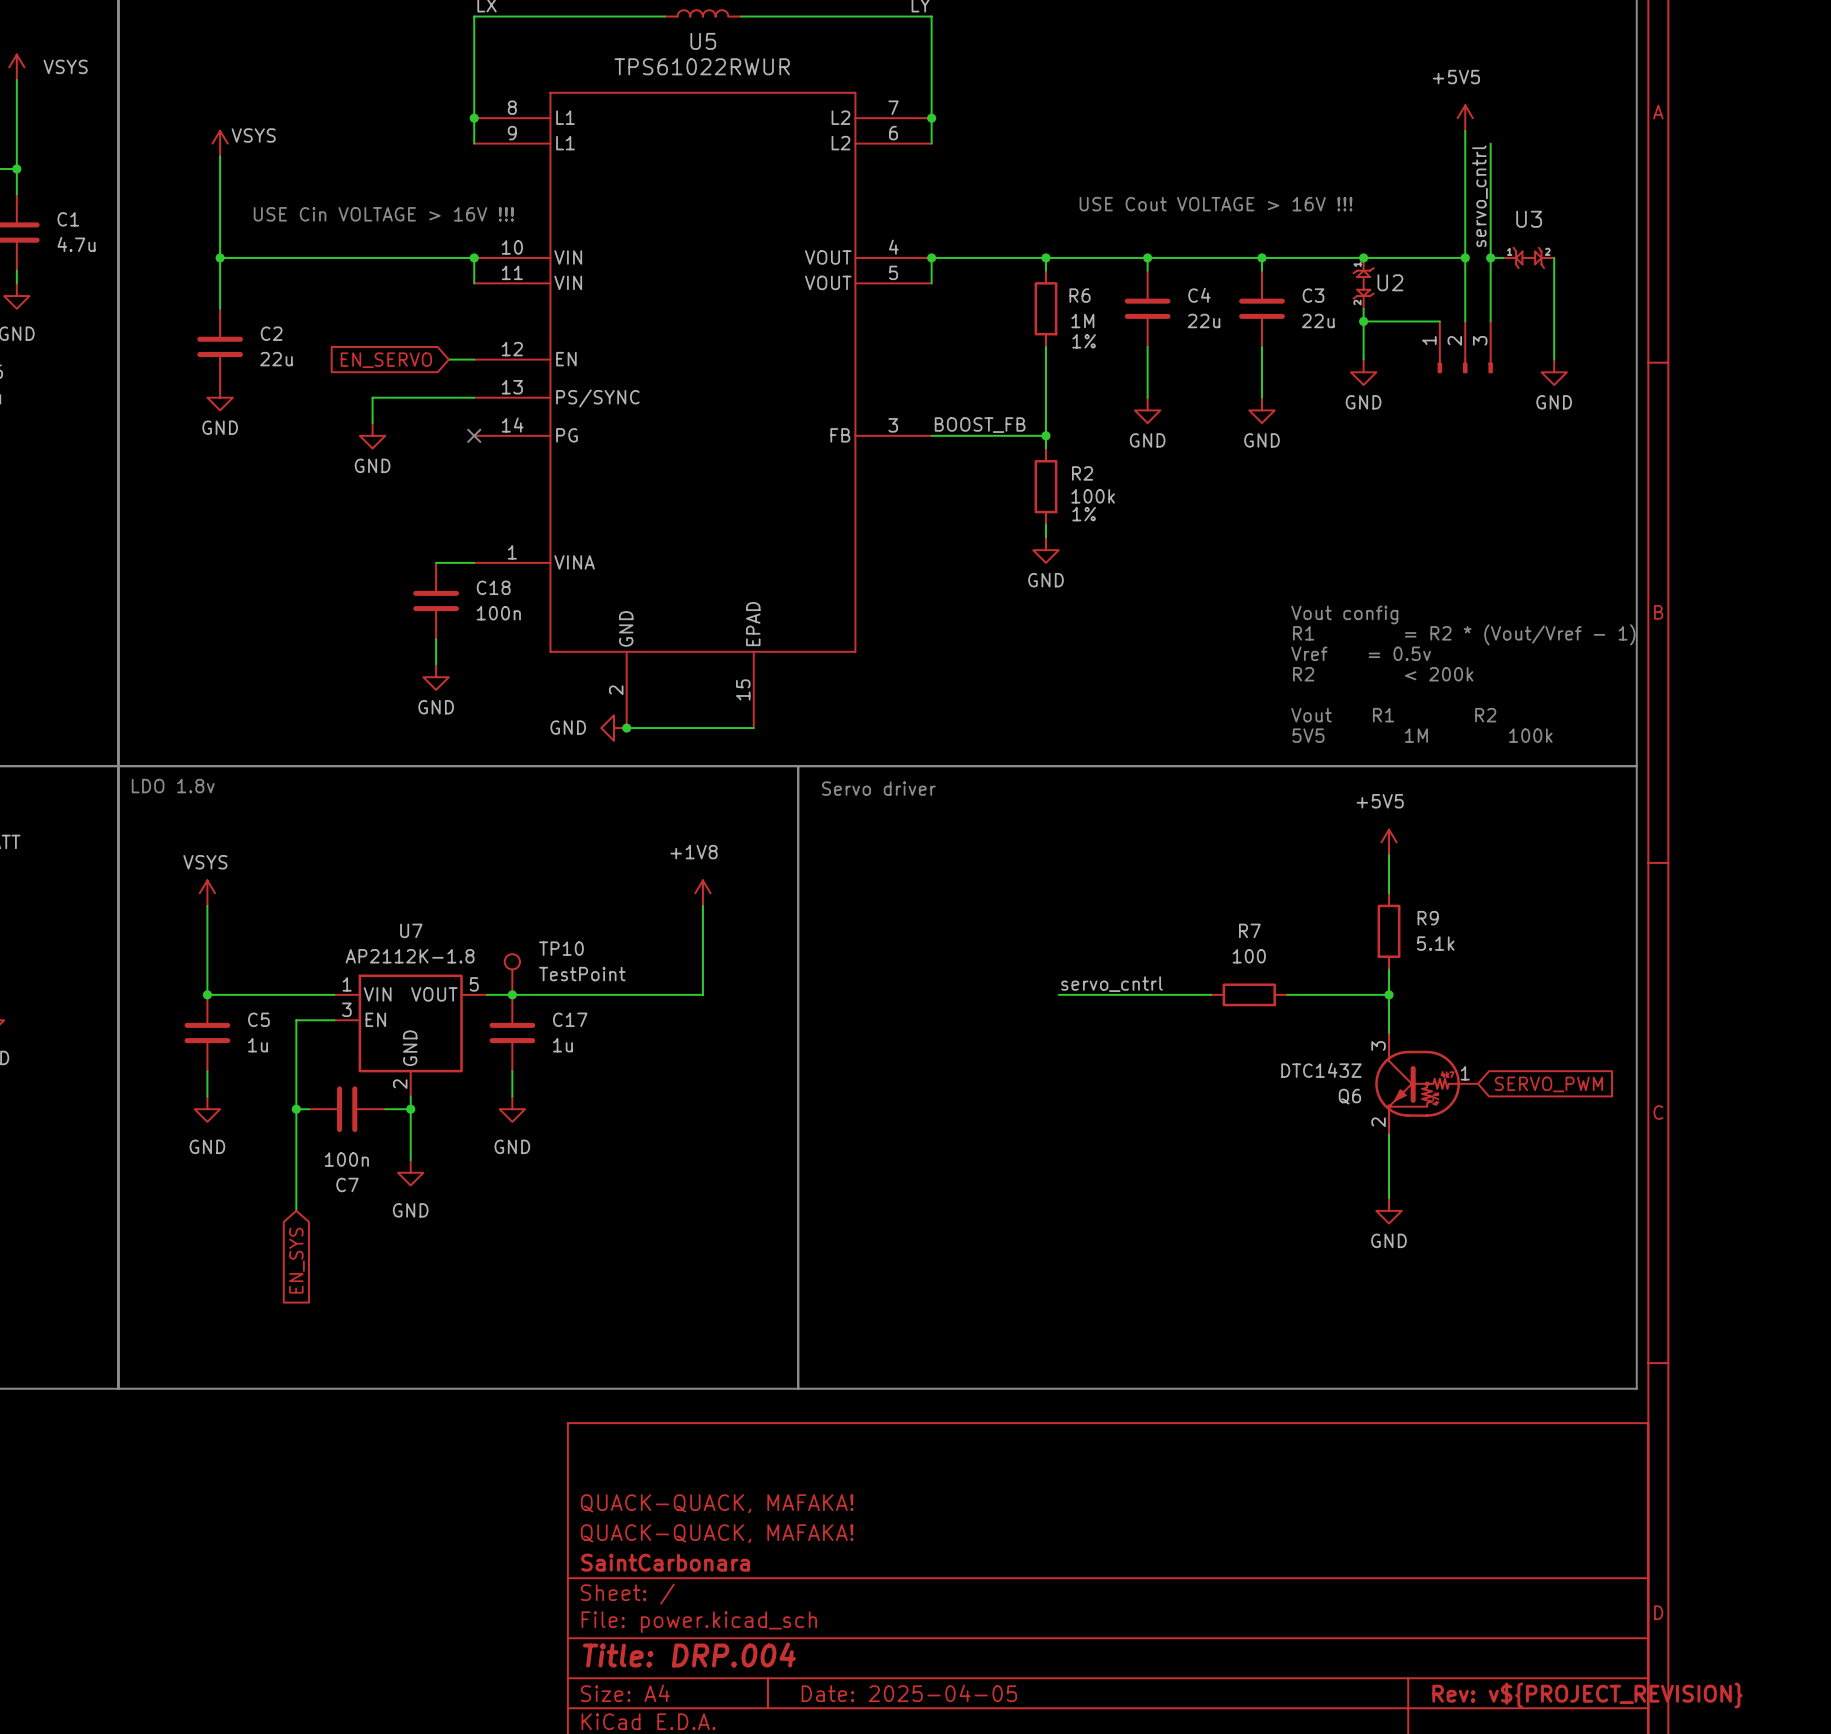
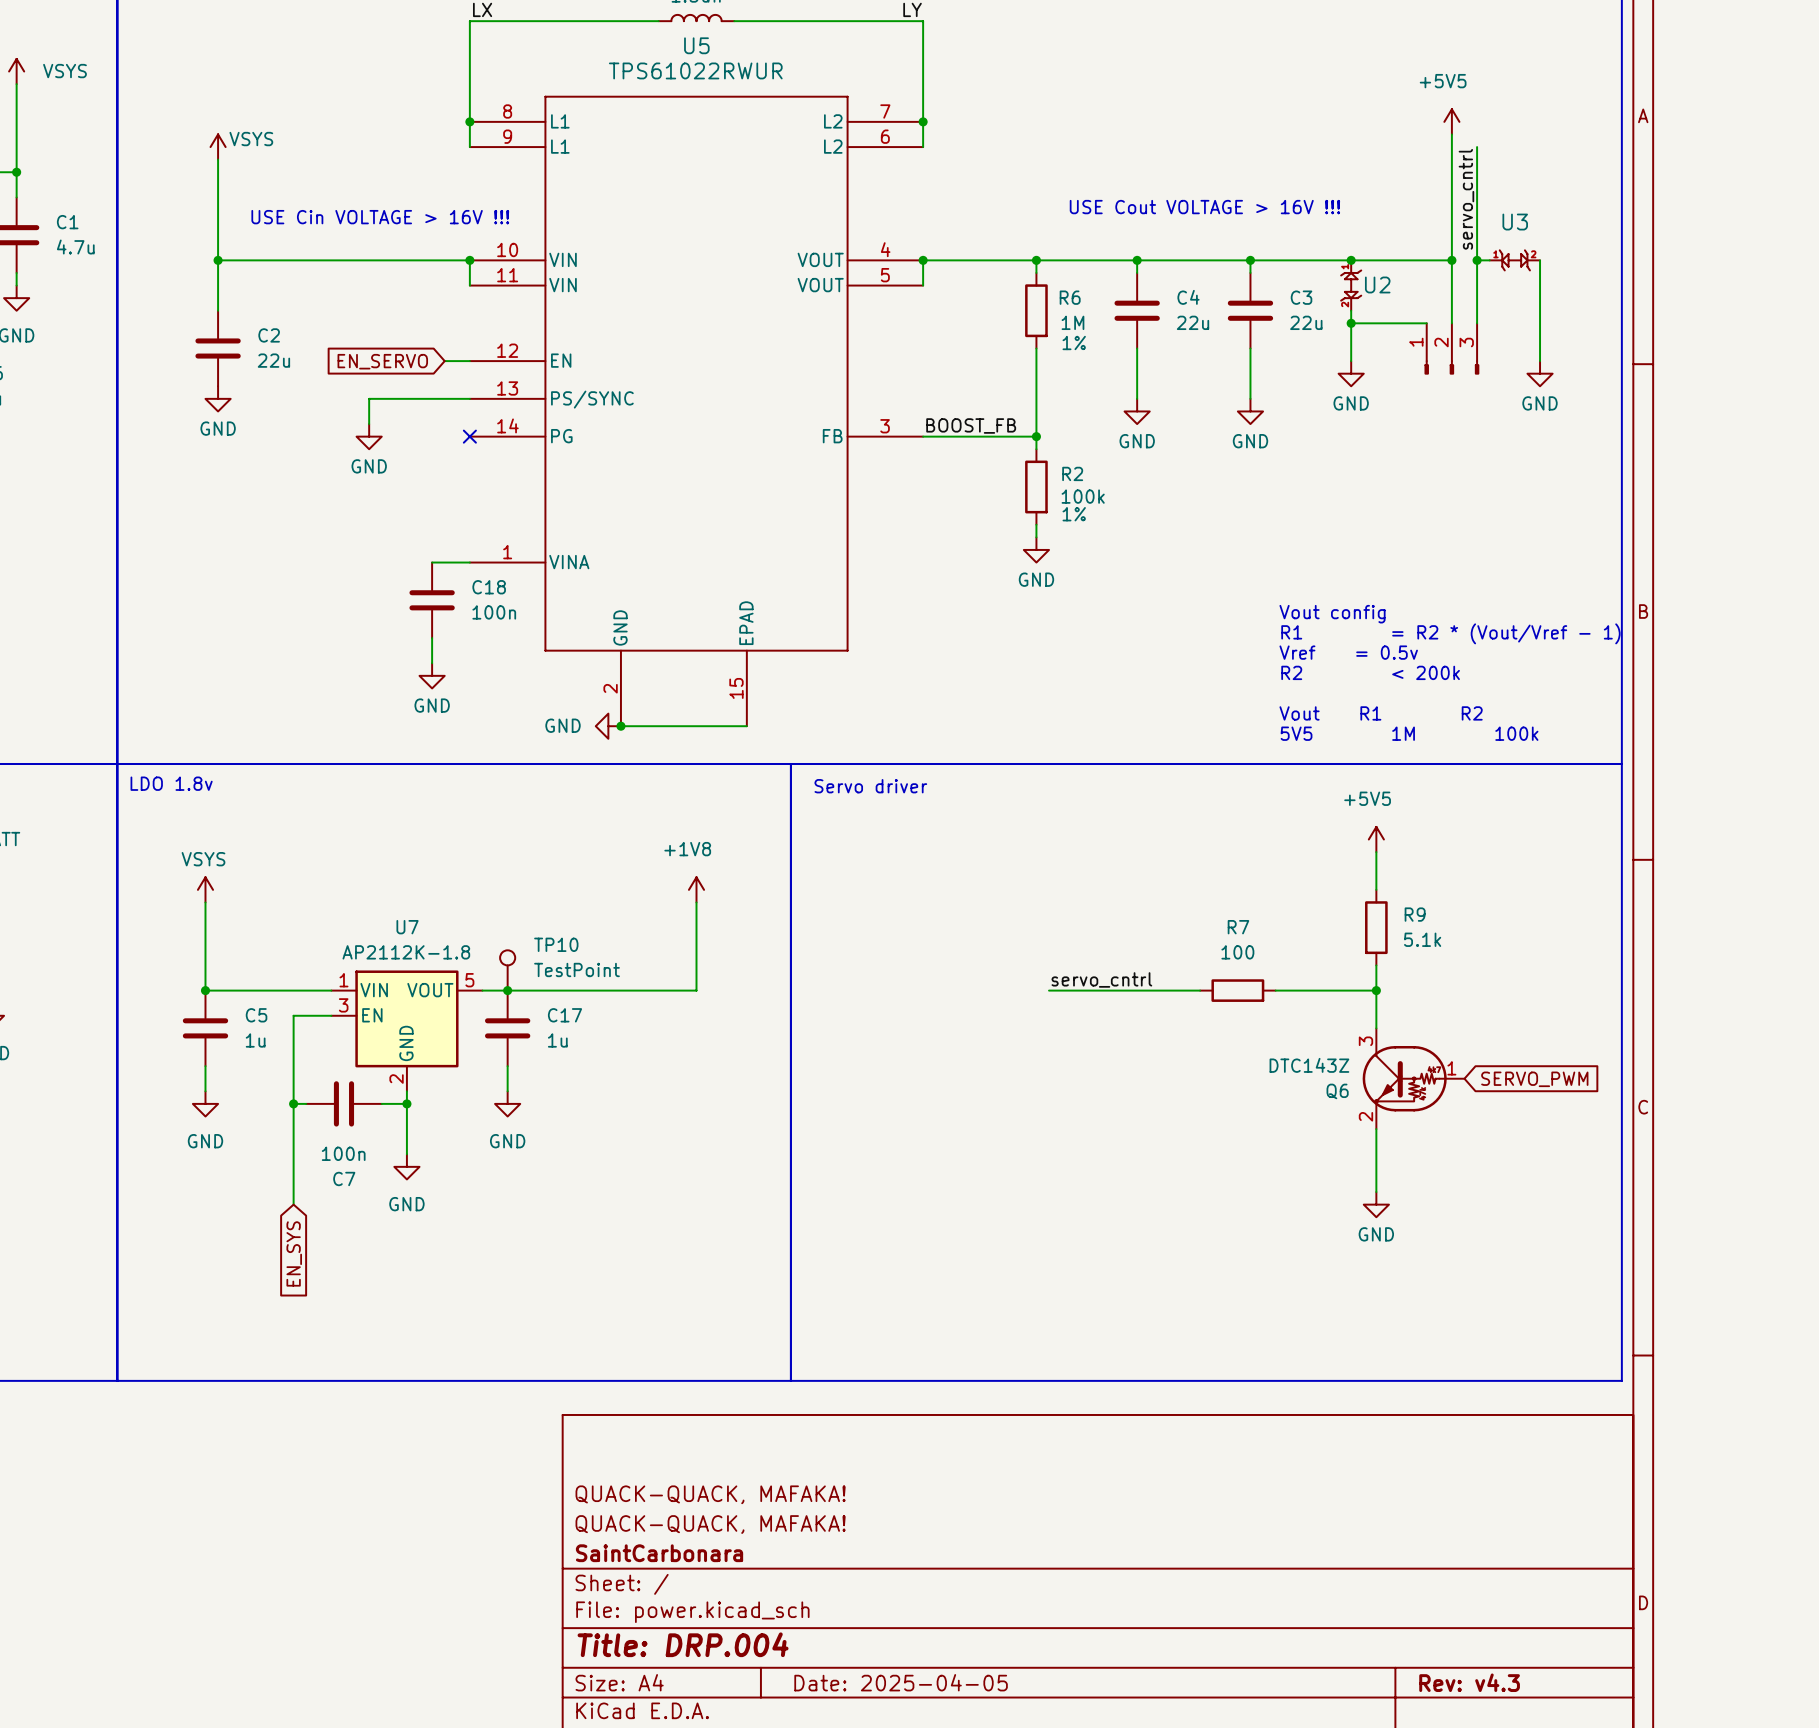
title block: Rev: v${PROJECT_REVISION} (1587, 1695) -> Rev: v4.3 (1469, 1682)

